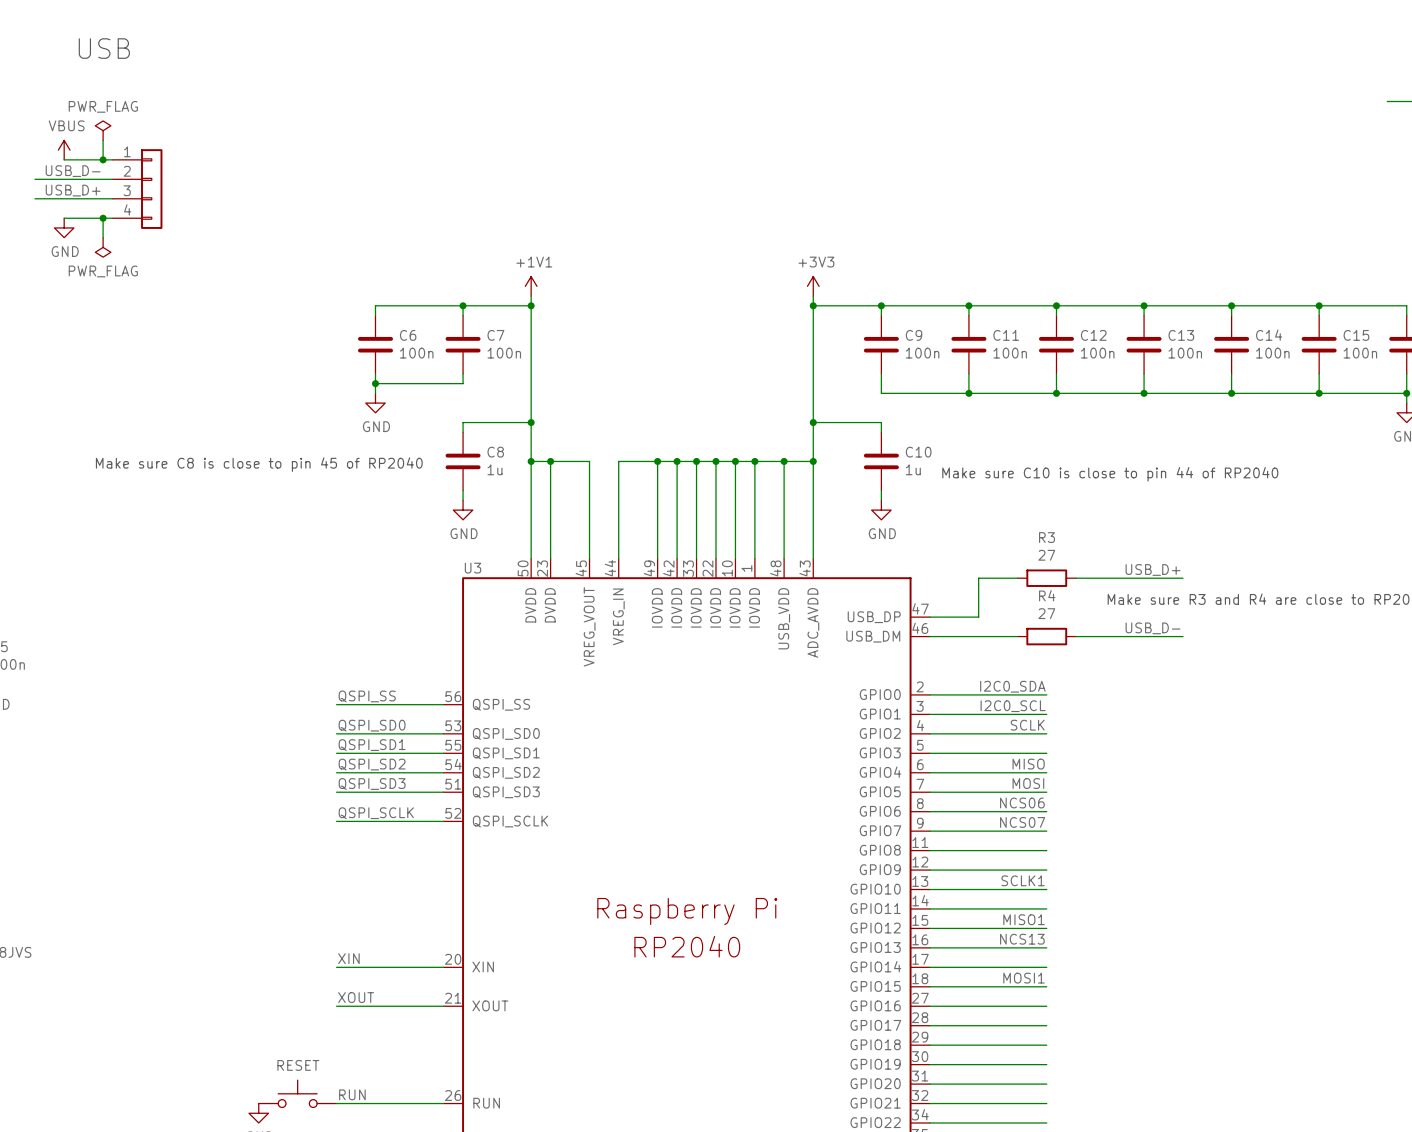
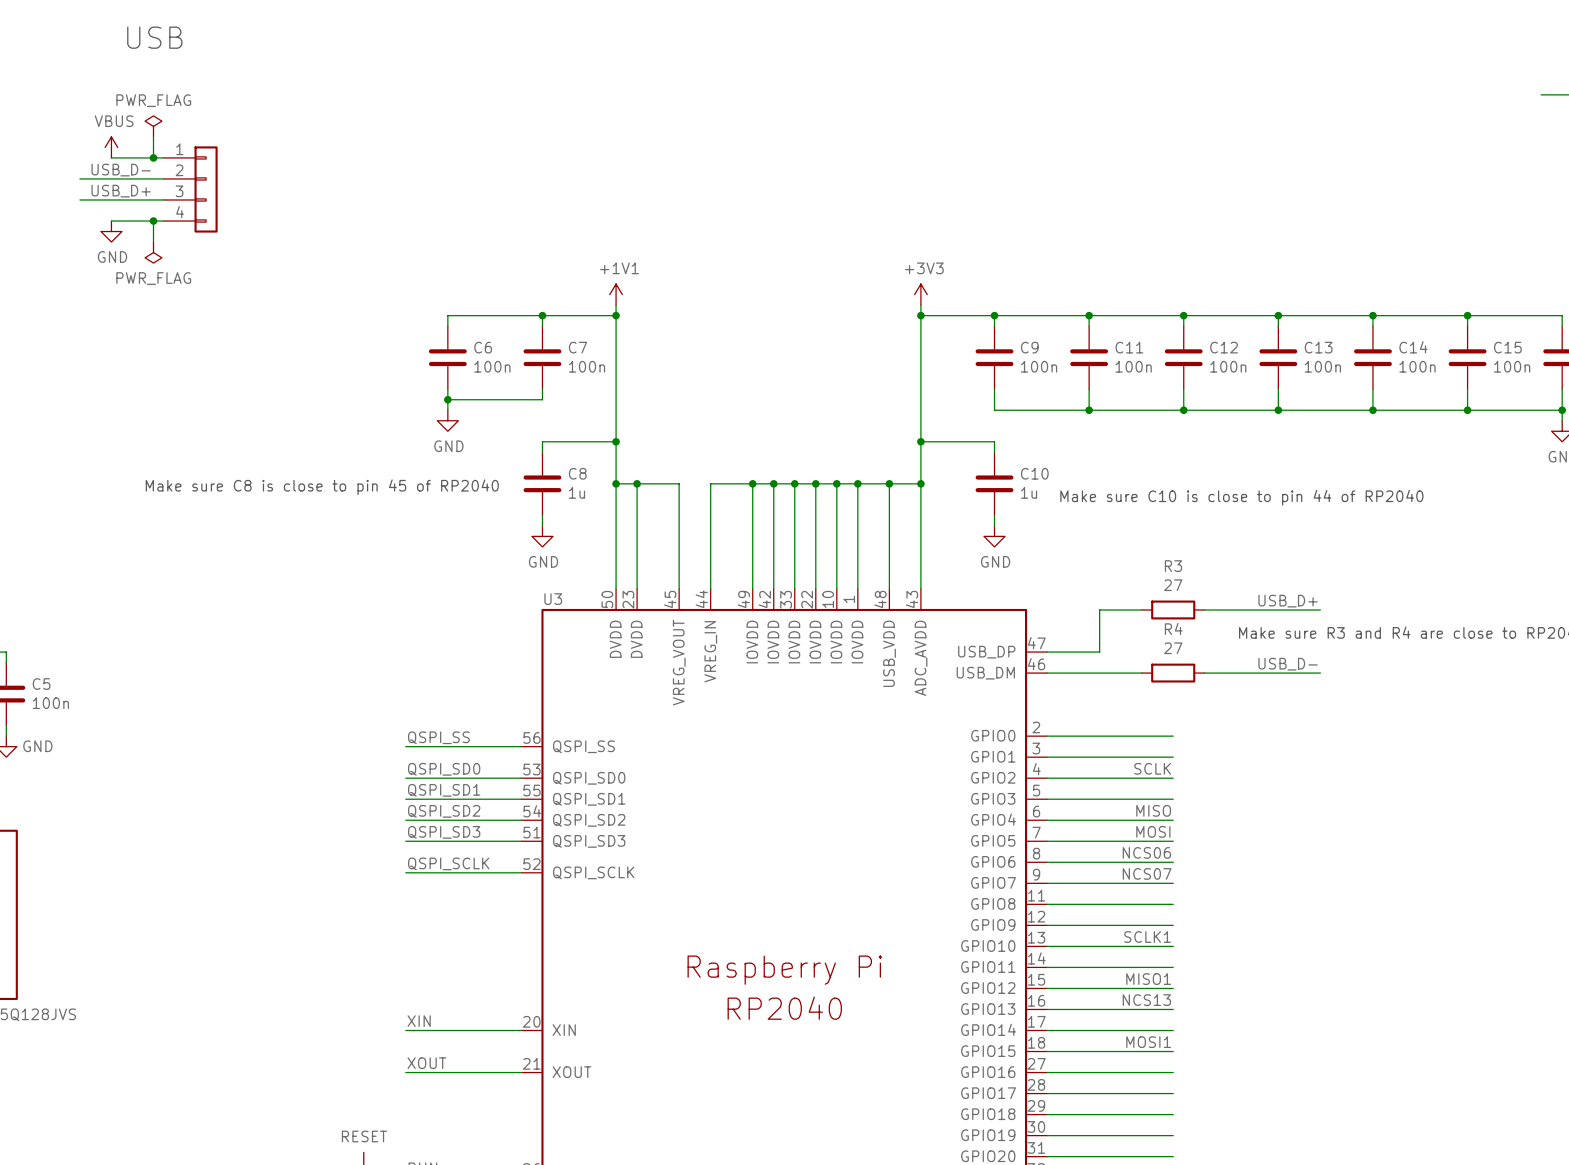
label: I2C0_SDA (1012, 686) -> none
label: I2C0_SCL (1013, 706) -> none

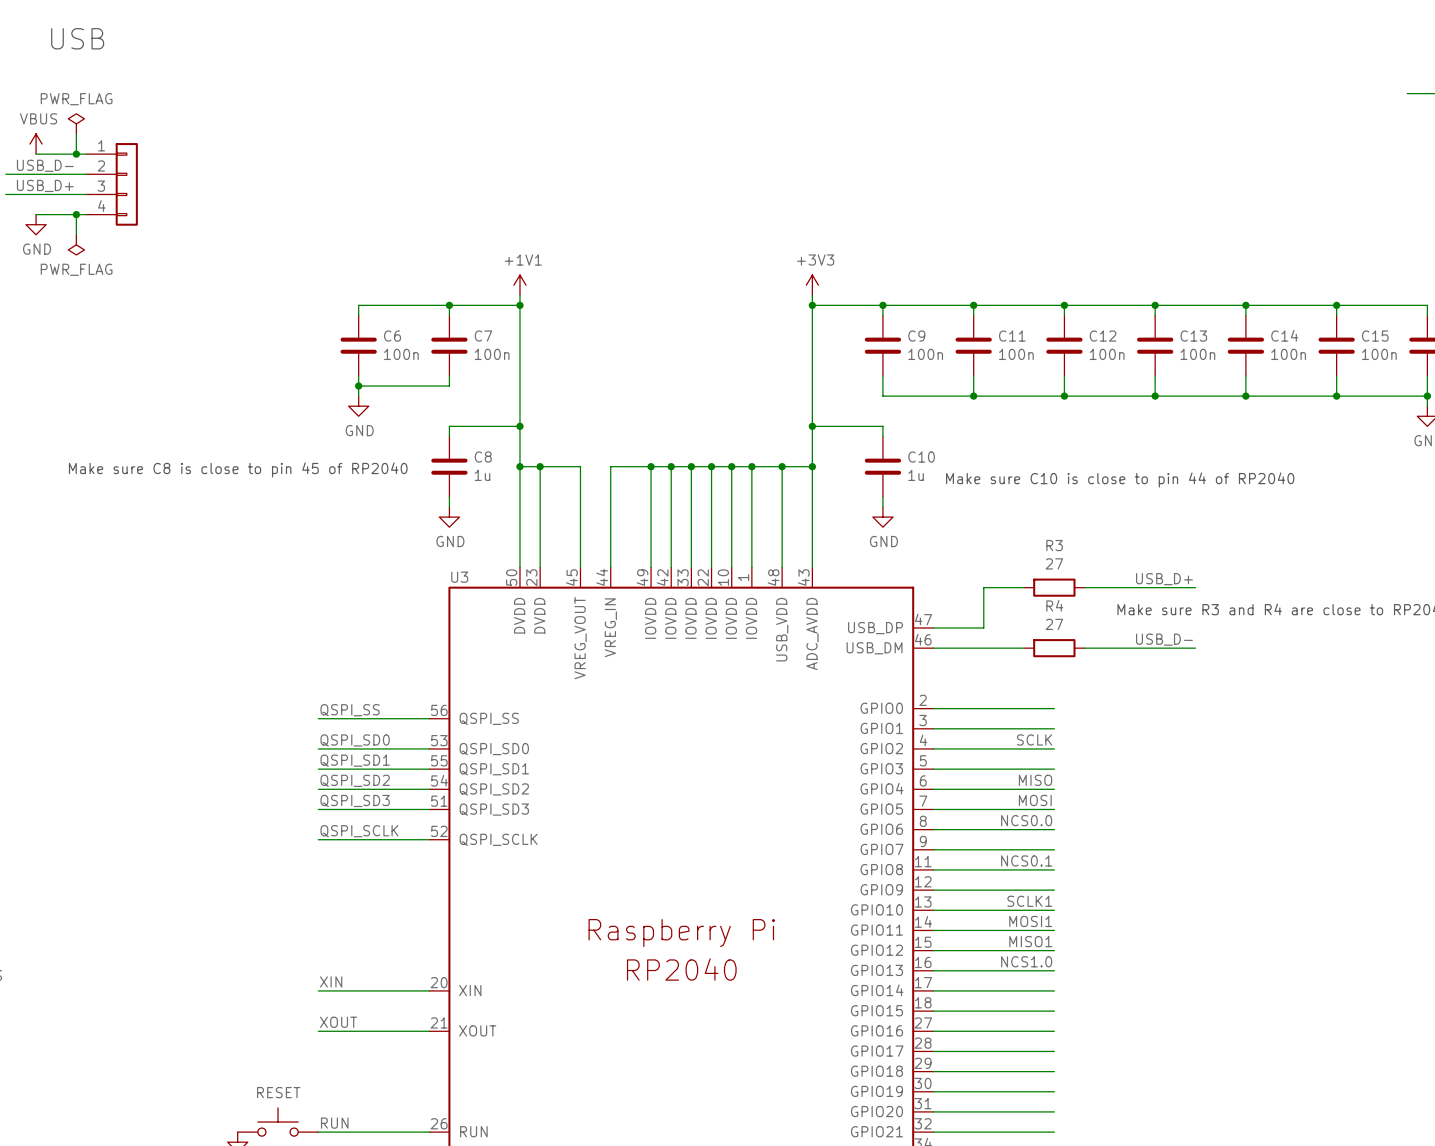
label: NCS06 (1146, 852) -> NCS0.0 (1026, 820)
label: NCS07 (1147, 873) -> NCS0.1 (1026, 860)
label: NCS13 (1146, 1000) -> NCS1.0 (1026, 961)
label position: MOSI1 (1148, 1042) -> MOSI1 (1030, 921)

